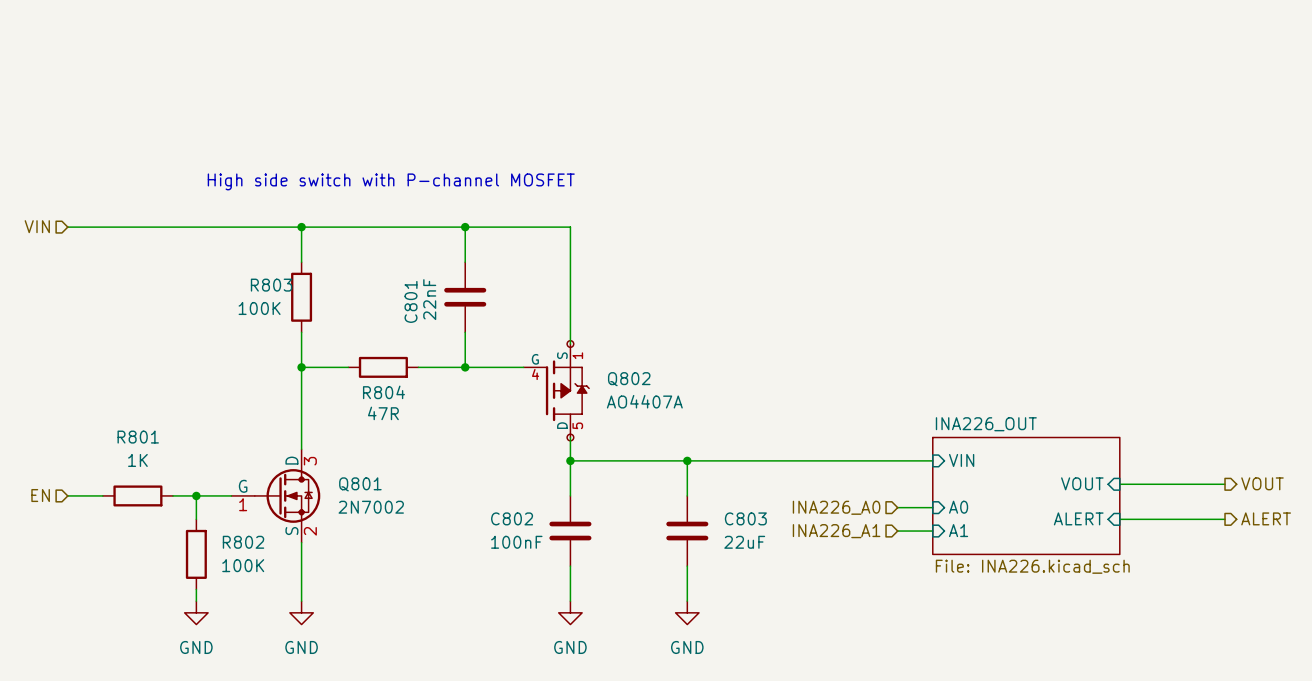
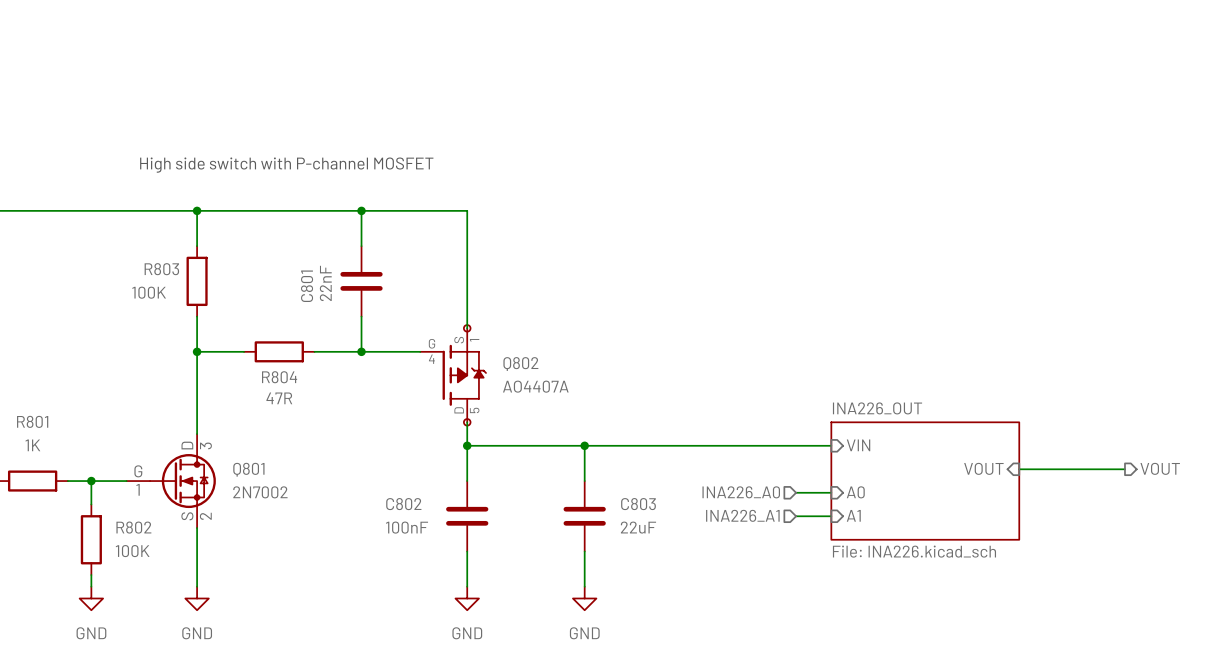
sheet pin: ALERT (1078, 518) -> none
hierarchical label: ALERT (1266, 518) -> none
wire: (1119, 519) (1225, 519) -> none

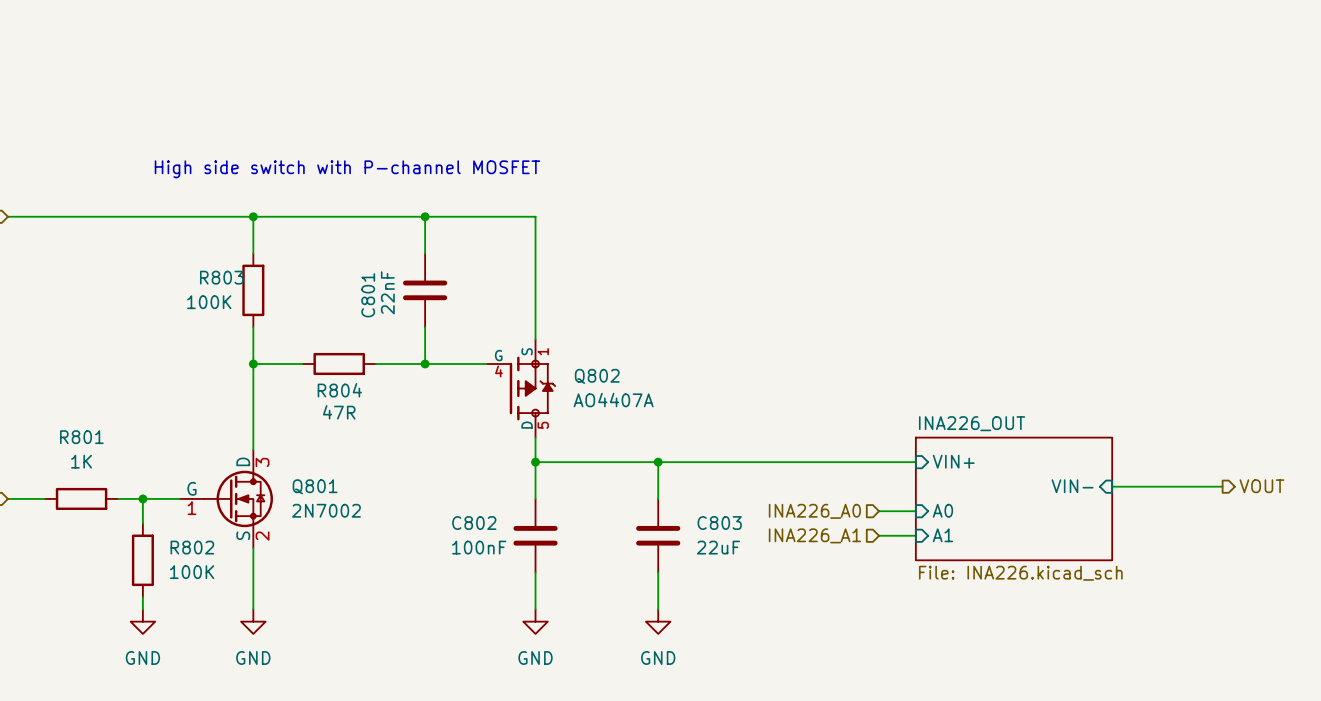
Q802 symbol: [420, 325, 487, 426] -> [486, 339, 556, 438]
sheet pin: VIN (858, 445) -> VIN+ (953, 461)
sheet pin: VOUT (983, 468) -> VIN- (1072, 486)

